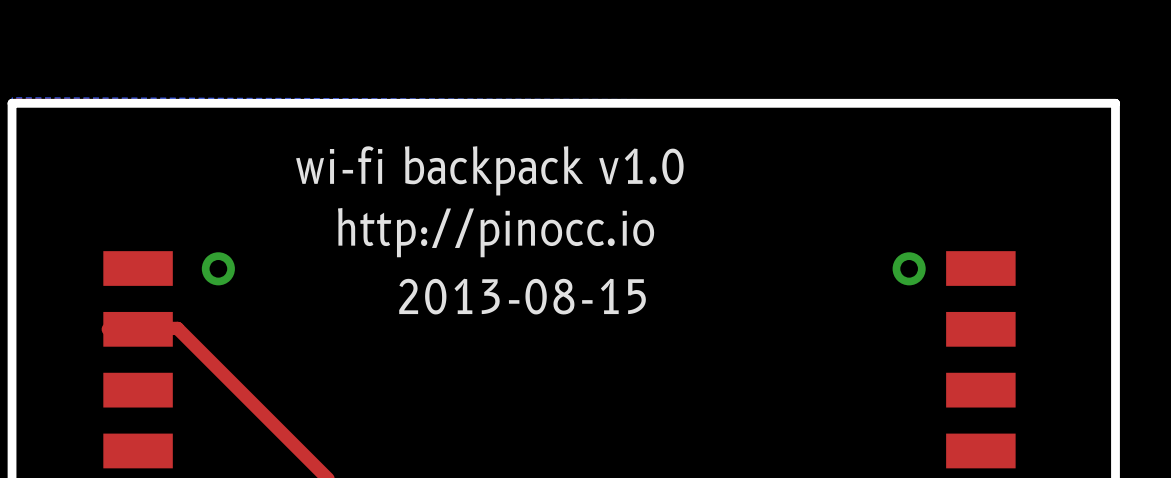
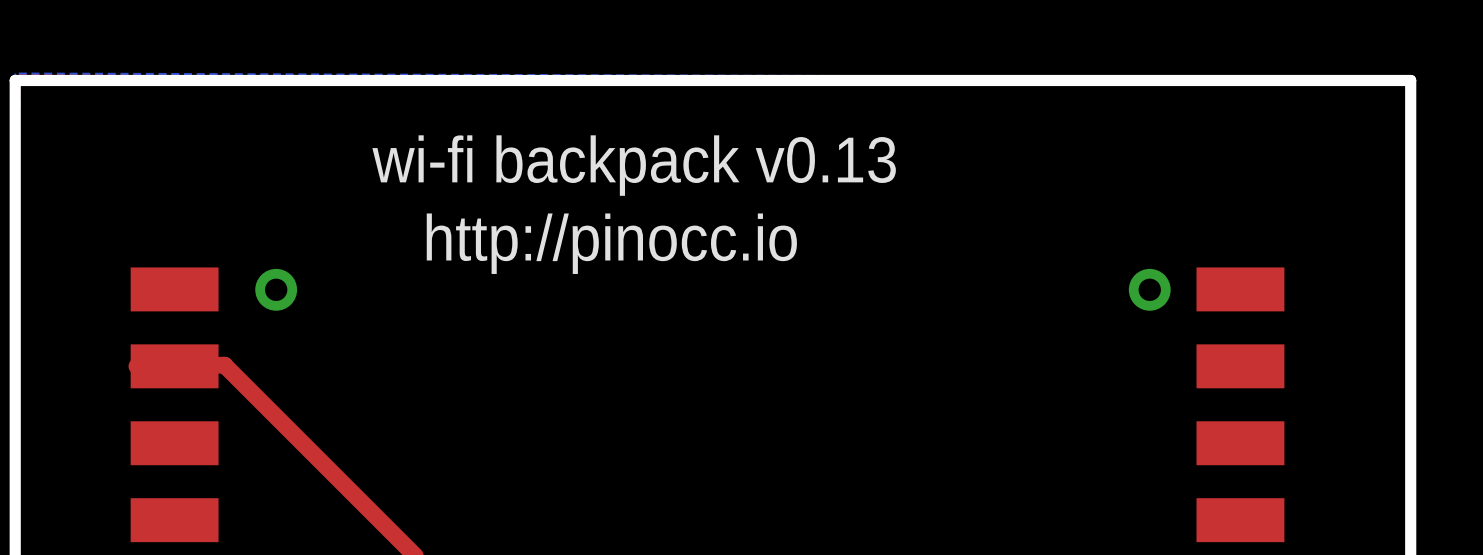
text: wi-fi backpack v1.0 (489, 170) -> wi-fi backpack v0.13 (634, 165)
text: 2013-08-15 (522, 296) -> none

